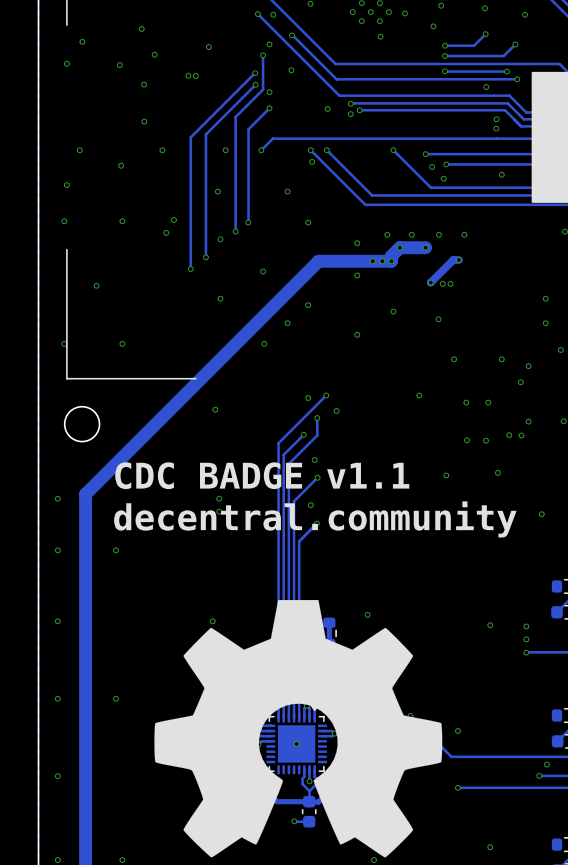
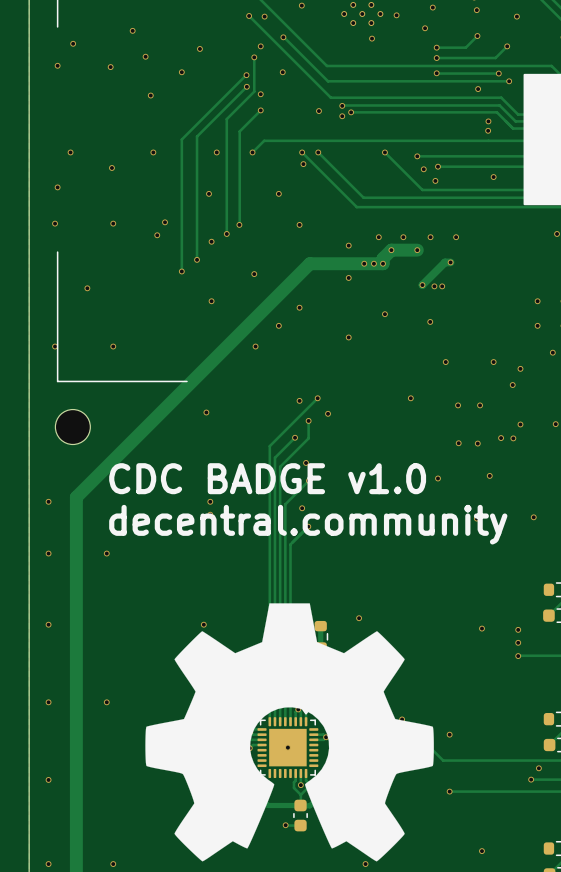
via: none -> (181, 72)
via: (188, 75) -> none
via: (195, 75) -> none
via: (144, 84) -> none
via: none -> (150, 95)
via: (144, 121) -> none
text: CDC BADGE v1.1 (262, 475) -> CDC BADGE v1.0 (267, 478)

